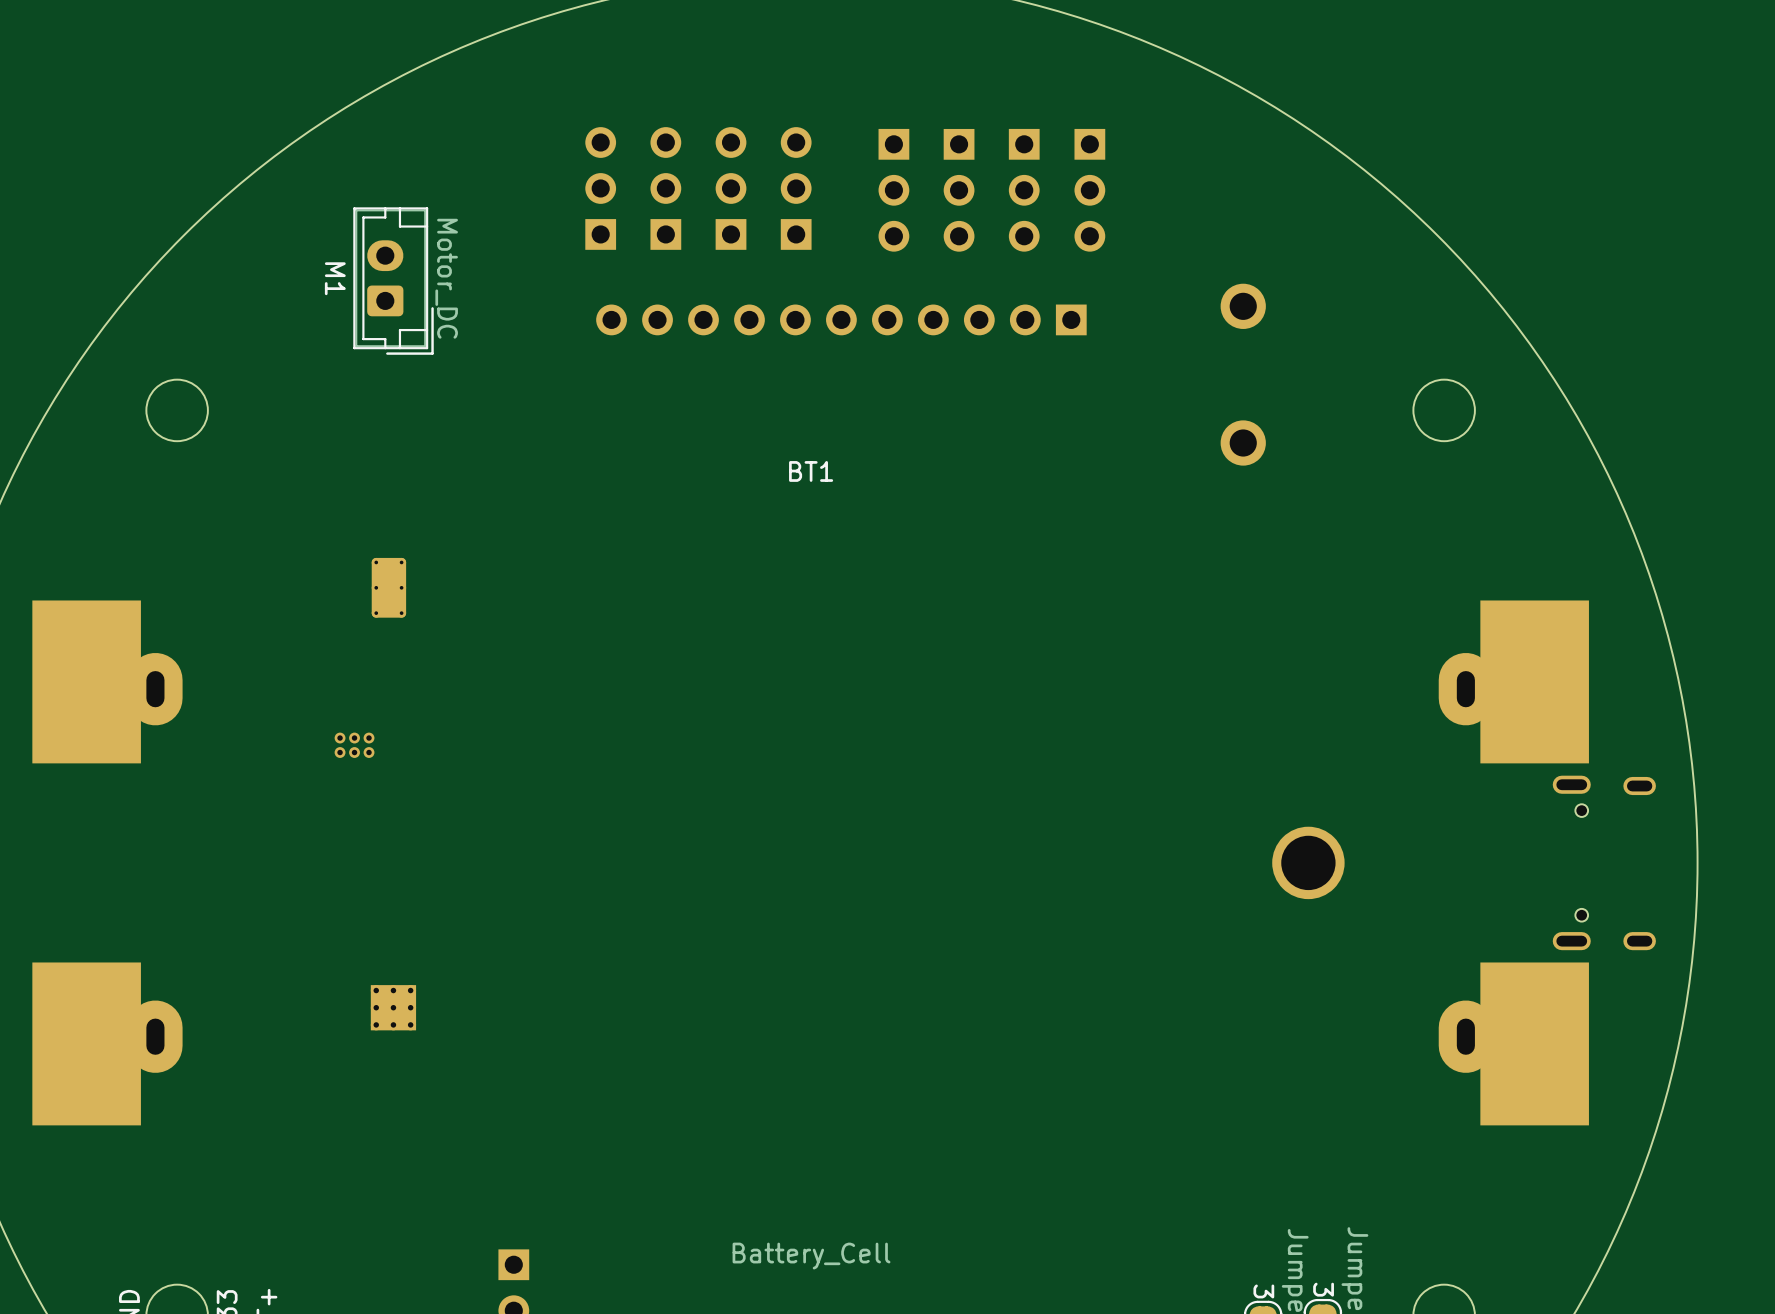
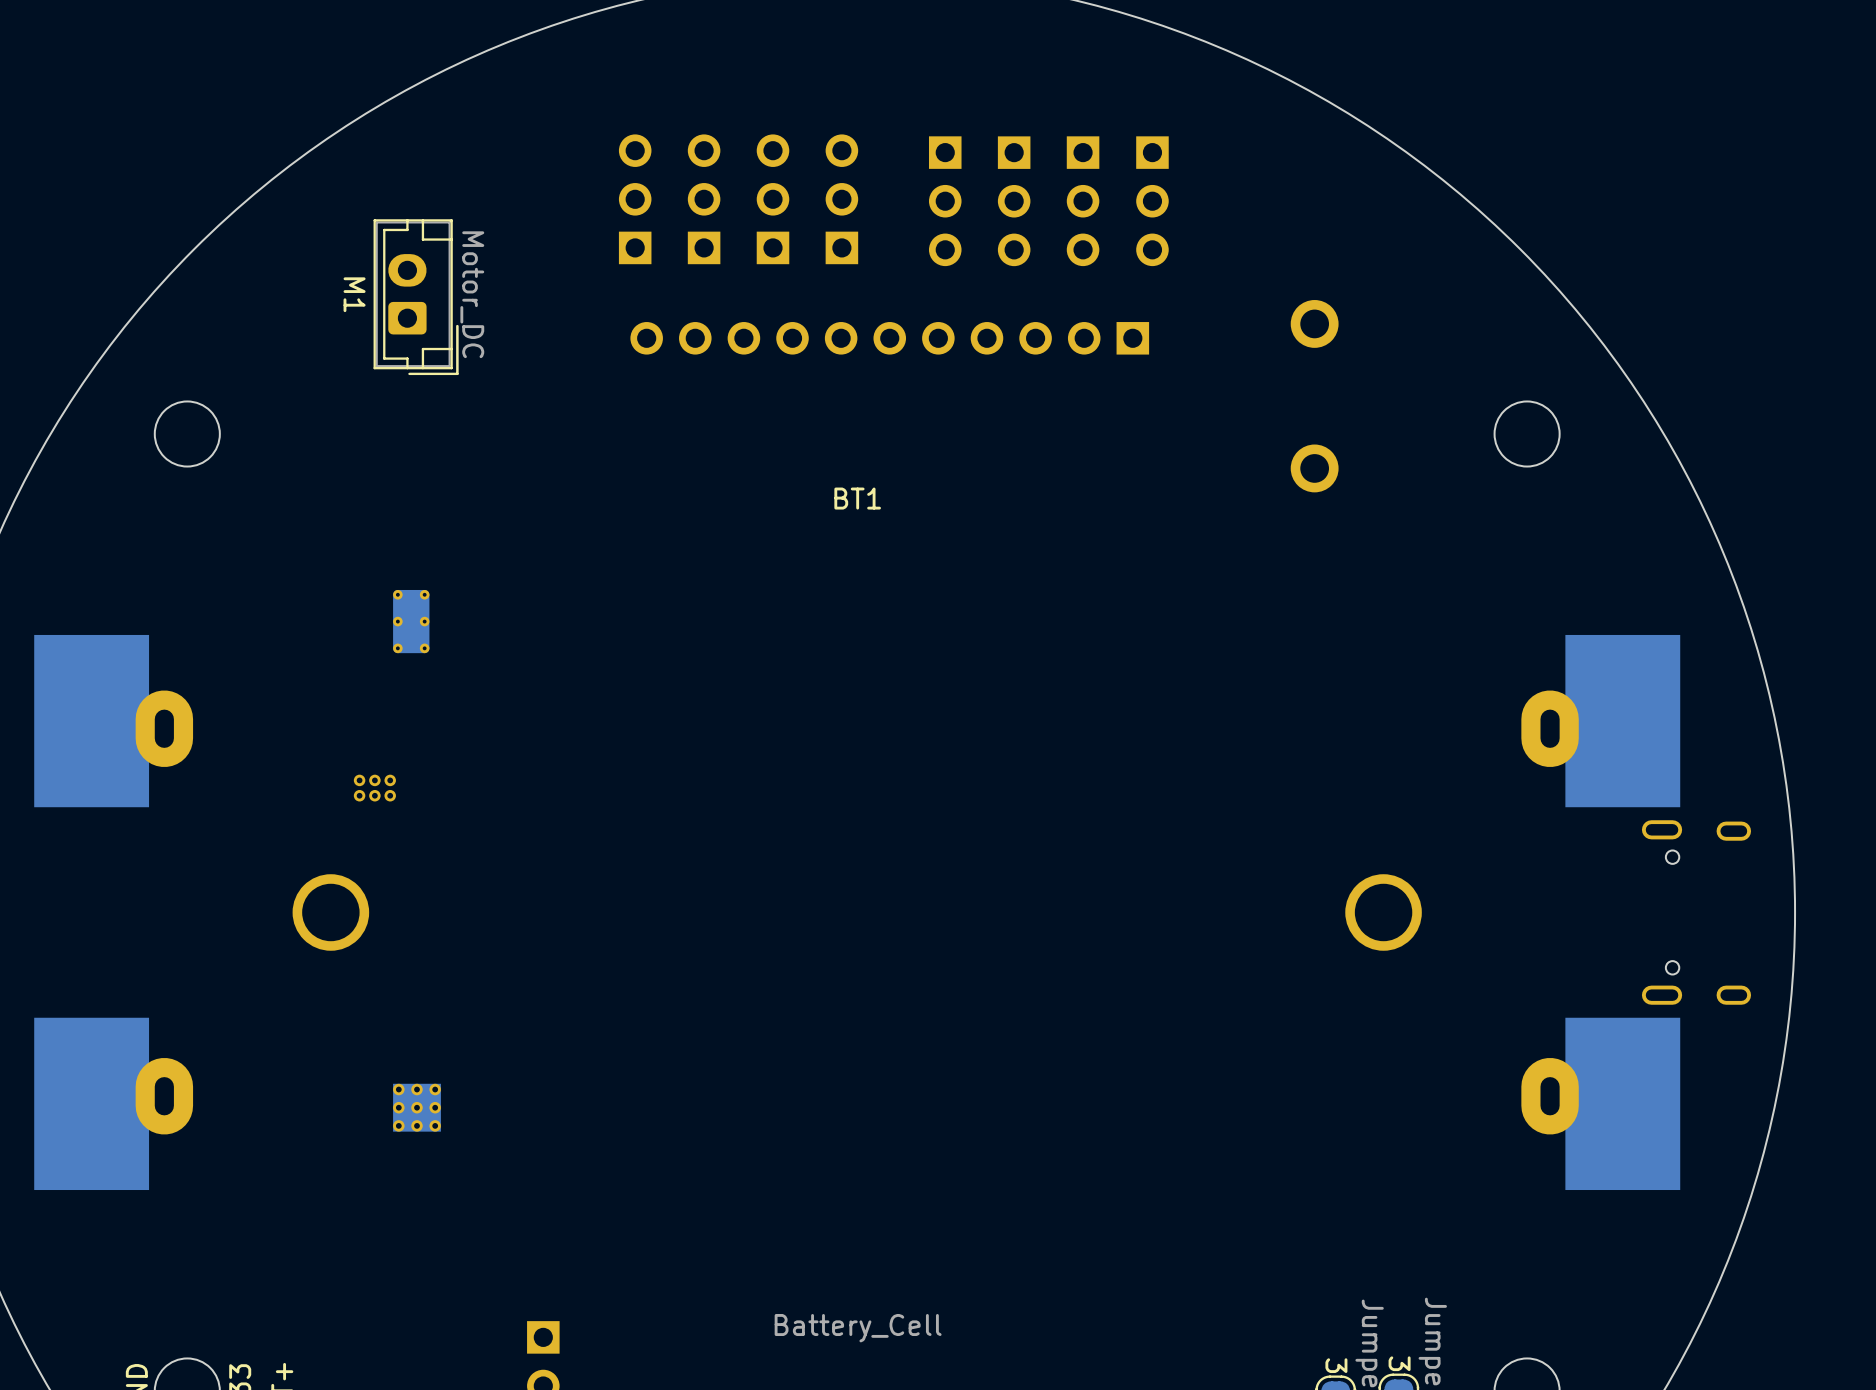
BT1 footprint: [32, 600, 1589, 1126] -> [34, 634, 1681, 1191]
part position: (393, 1007) -> (417, 1107)

